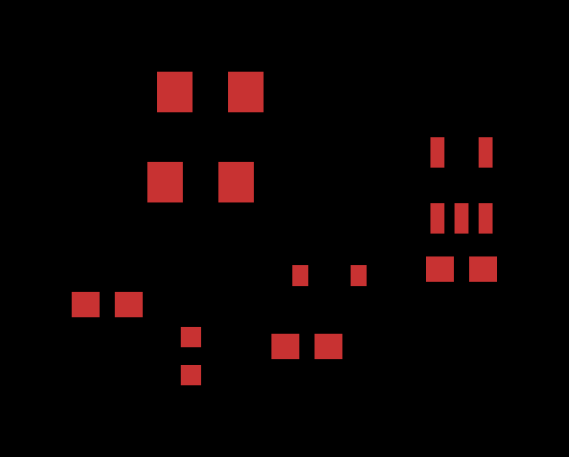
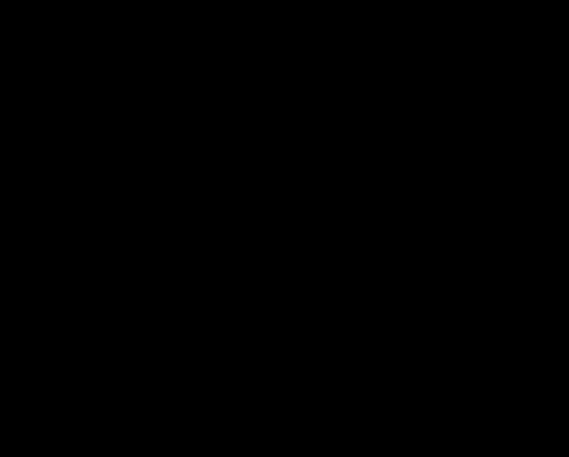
part: (210, 91) -> none
part: (200, 182) -> none
part: (461, 185) -> none
part: (461, 269) -> none
part: (329, 275) -> none
part: (107, 304) -> none
part: (306, 346) -> none
part: (190, 356) -> none

